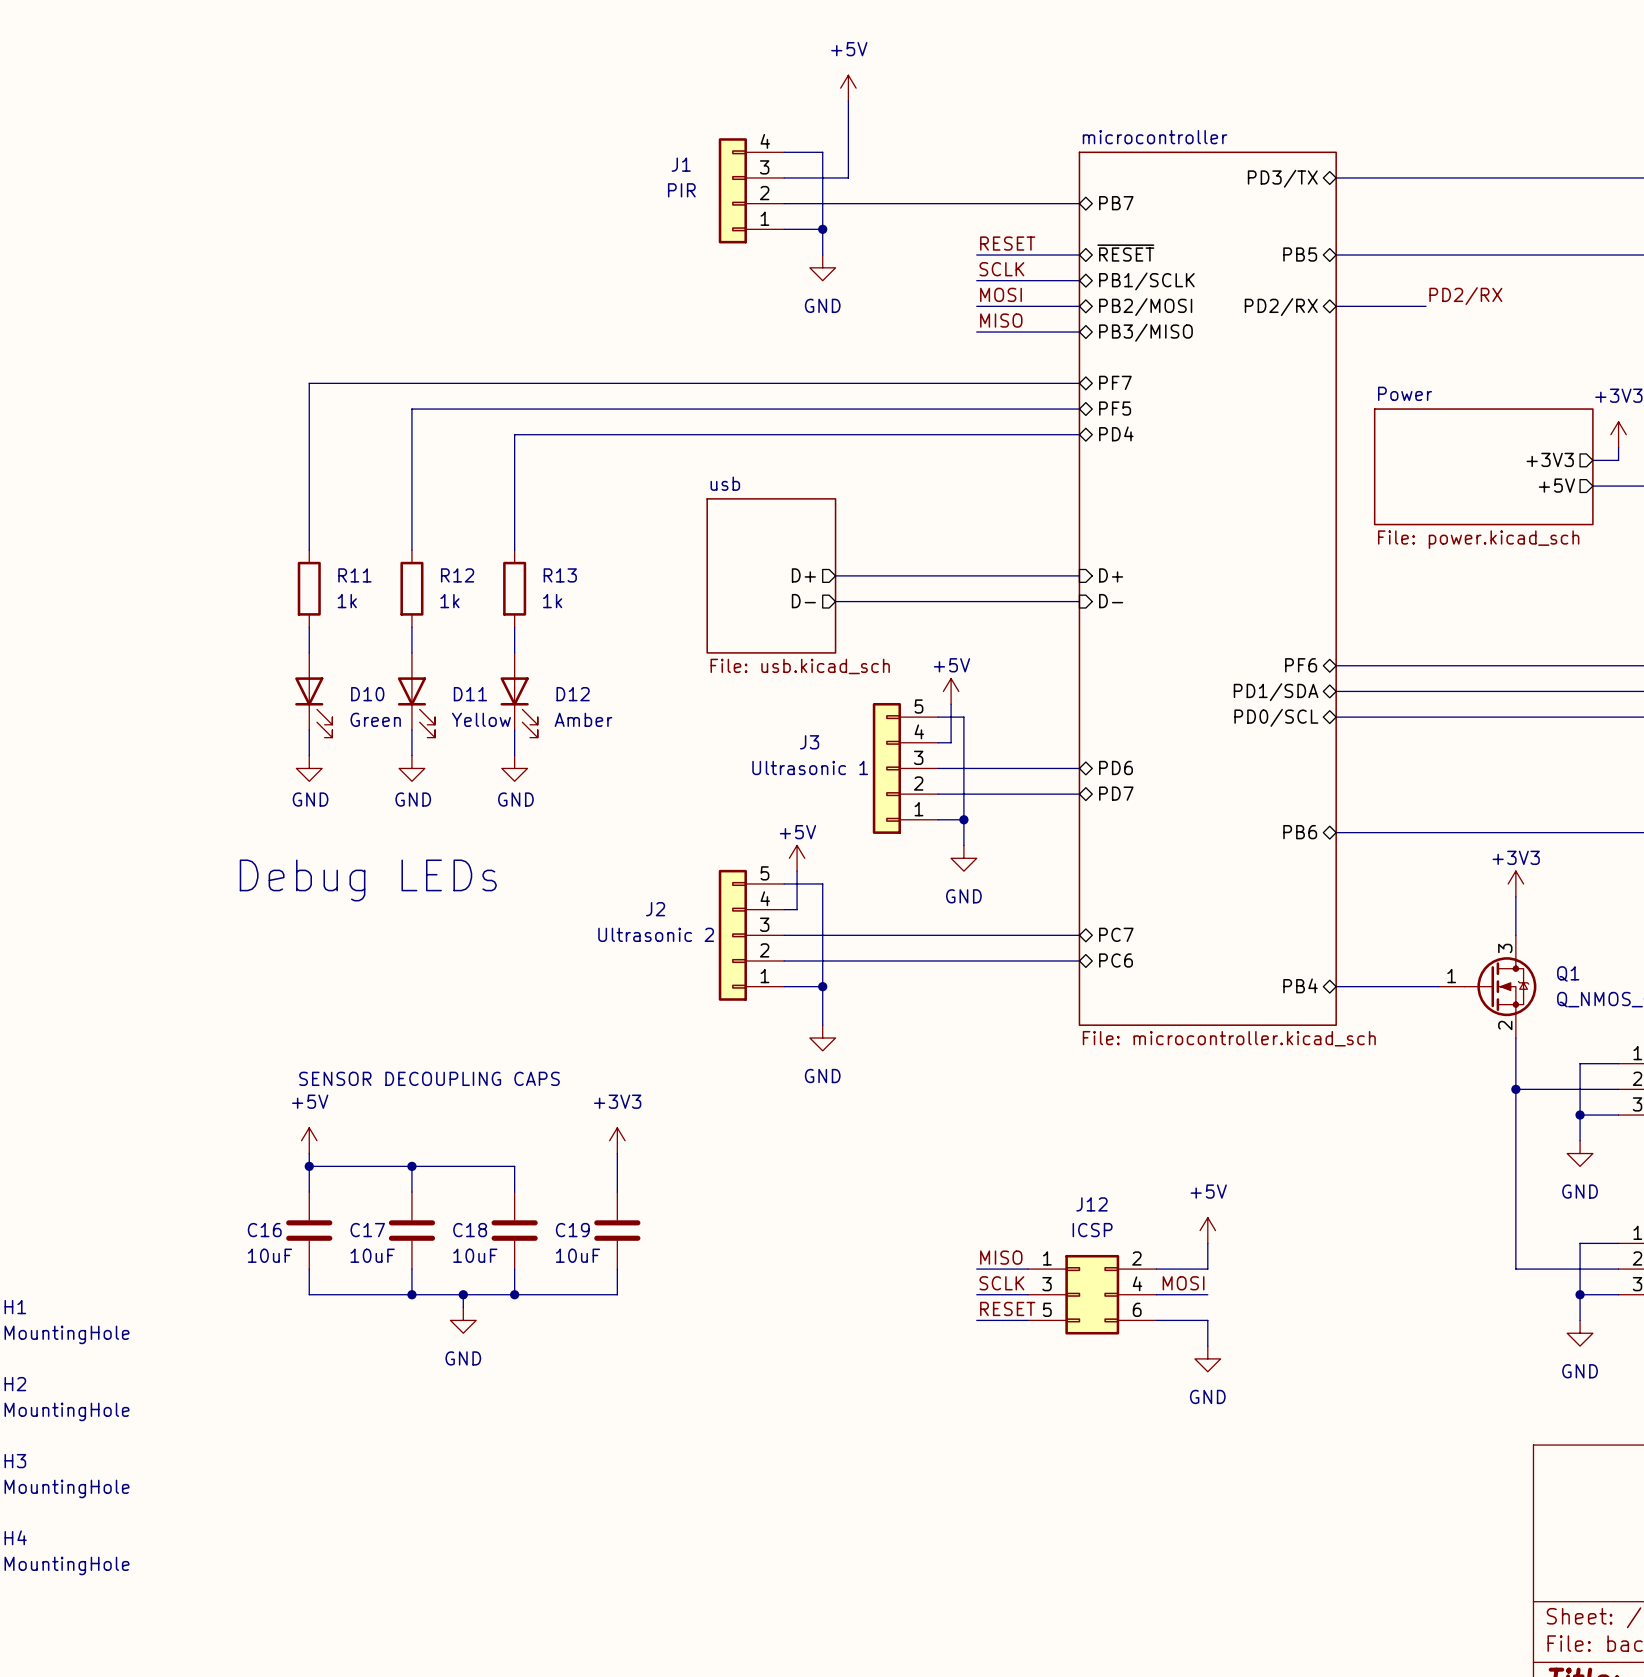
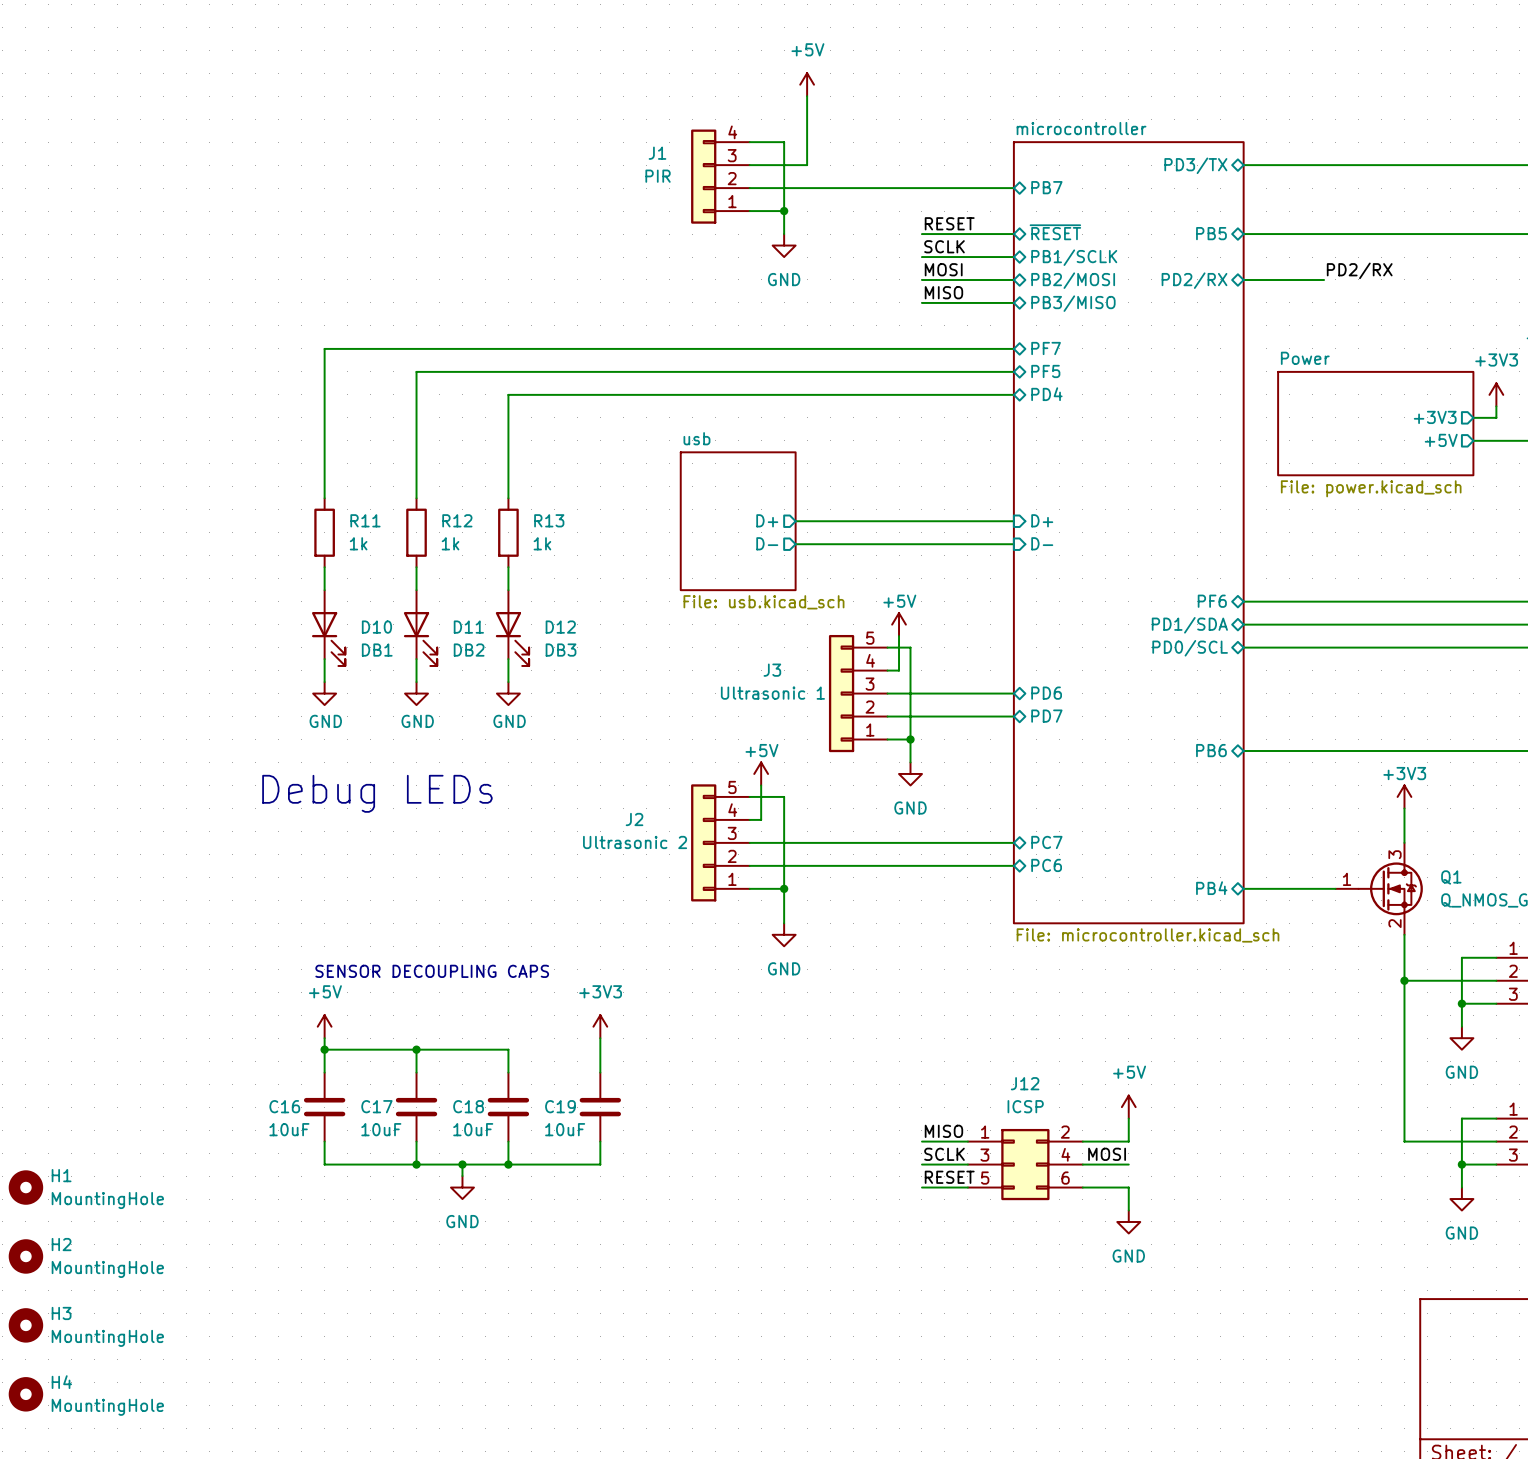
D10 value: Green (375, 719) -> DB1 (377, 650)
D11 value: Yellow (481, 719) -> DB2 (469, 650)
D12 value: Amber (583, 719) -> DB3 (561, 650)

